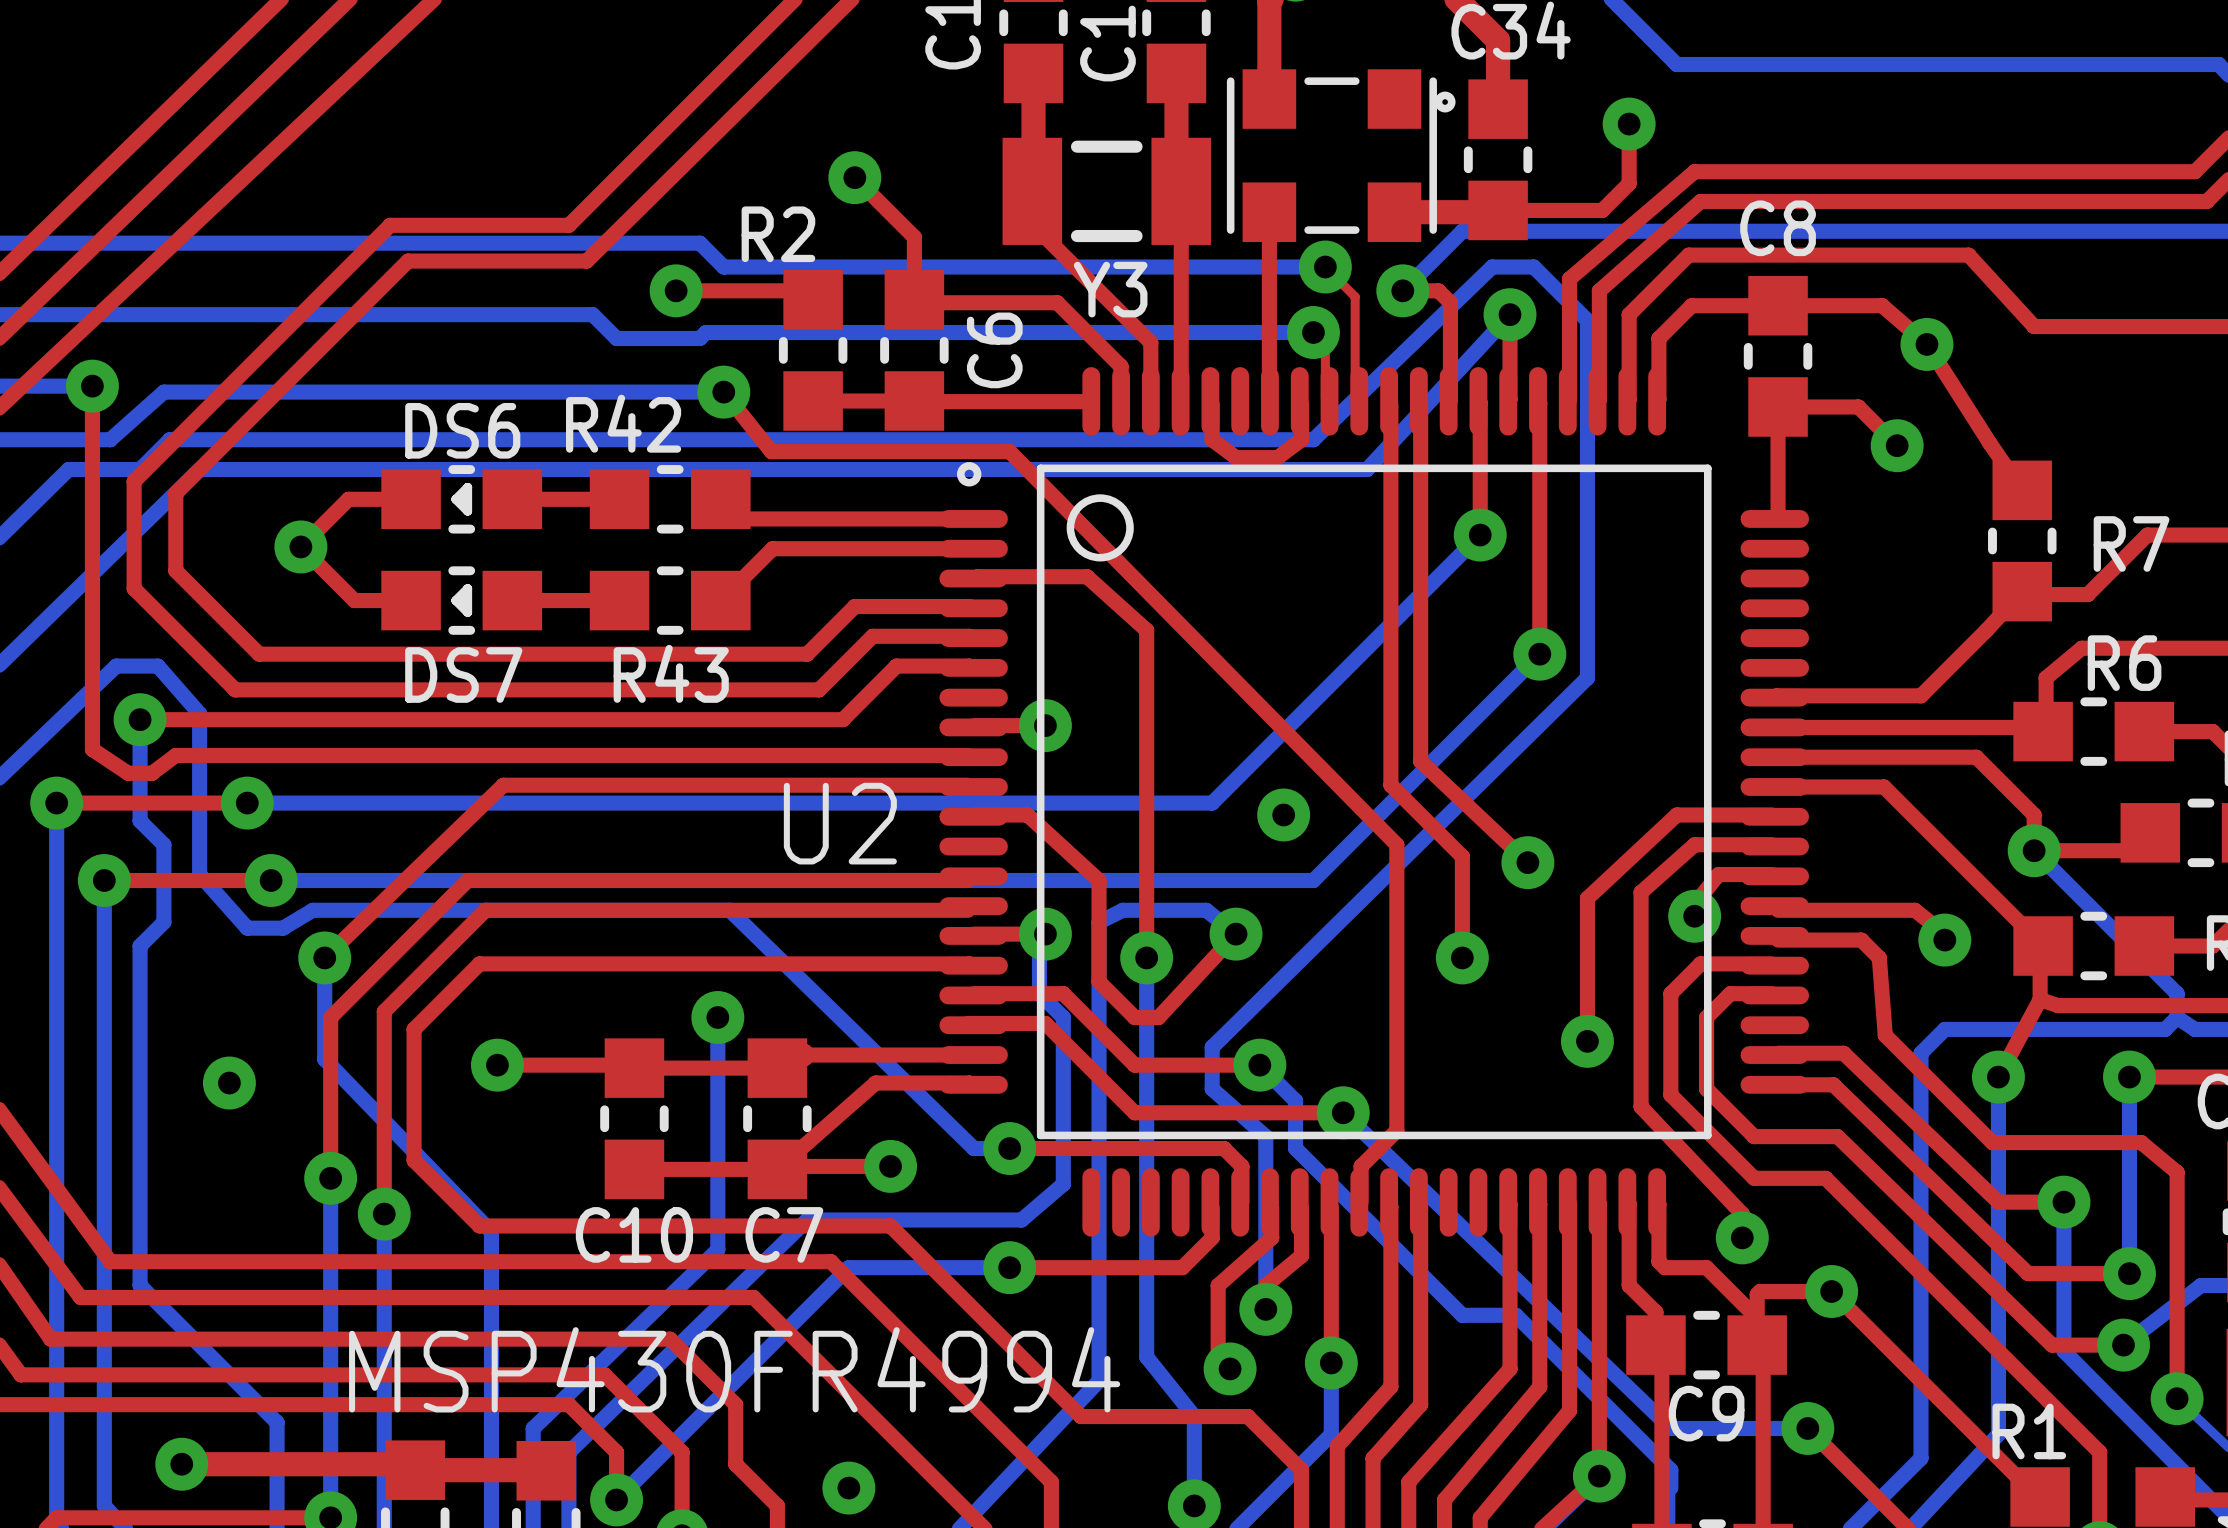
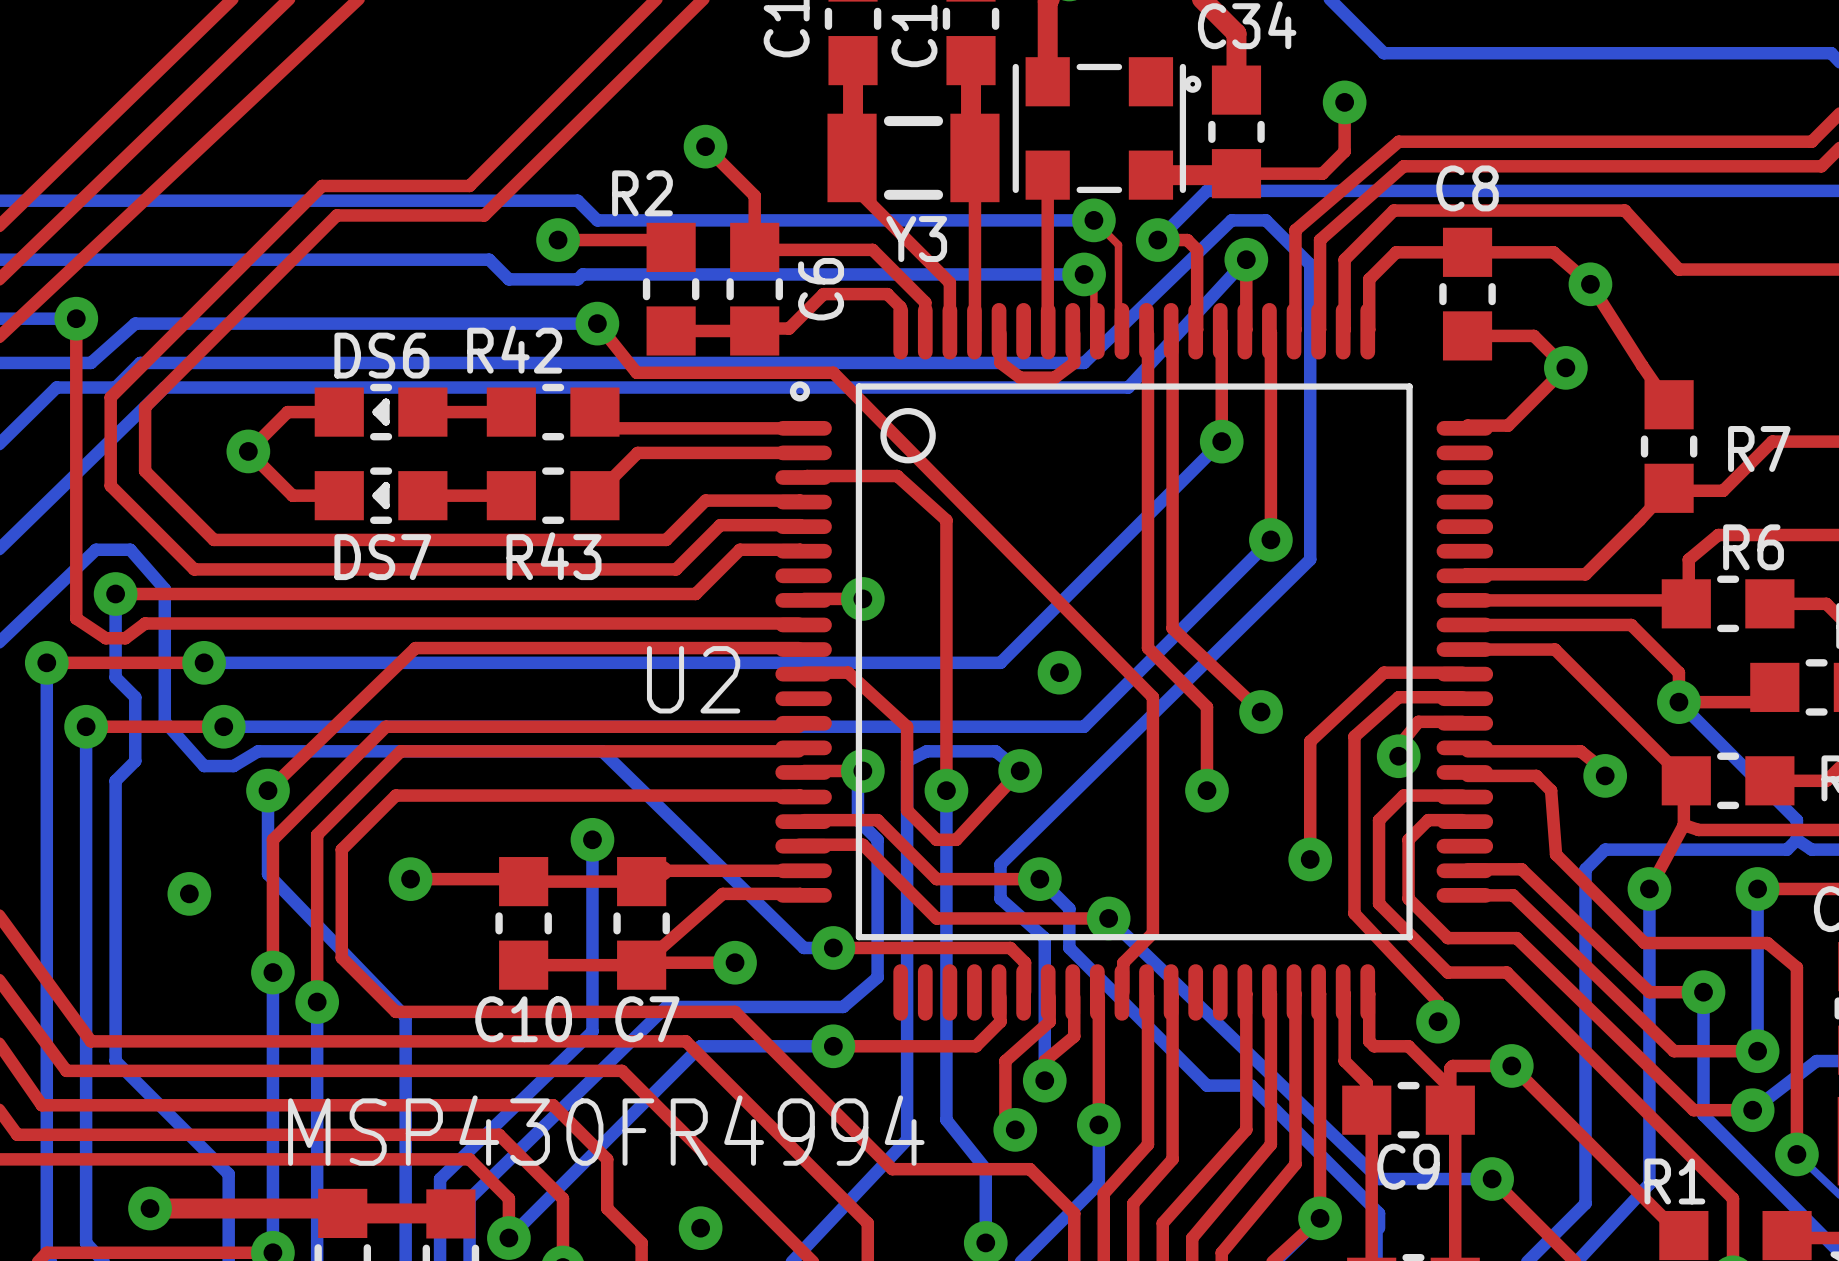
top track: (914, 401) (1090, 401) -> (754, 330) (757, 328) (789, 328) (823, 294) (887, 294) (900, 307) (900, 331)
top track: (1778, 406) (1778, 515) -> (1565, 367) (1508, 425) (1467, 425)

